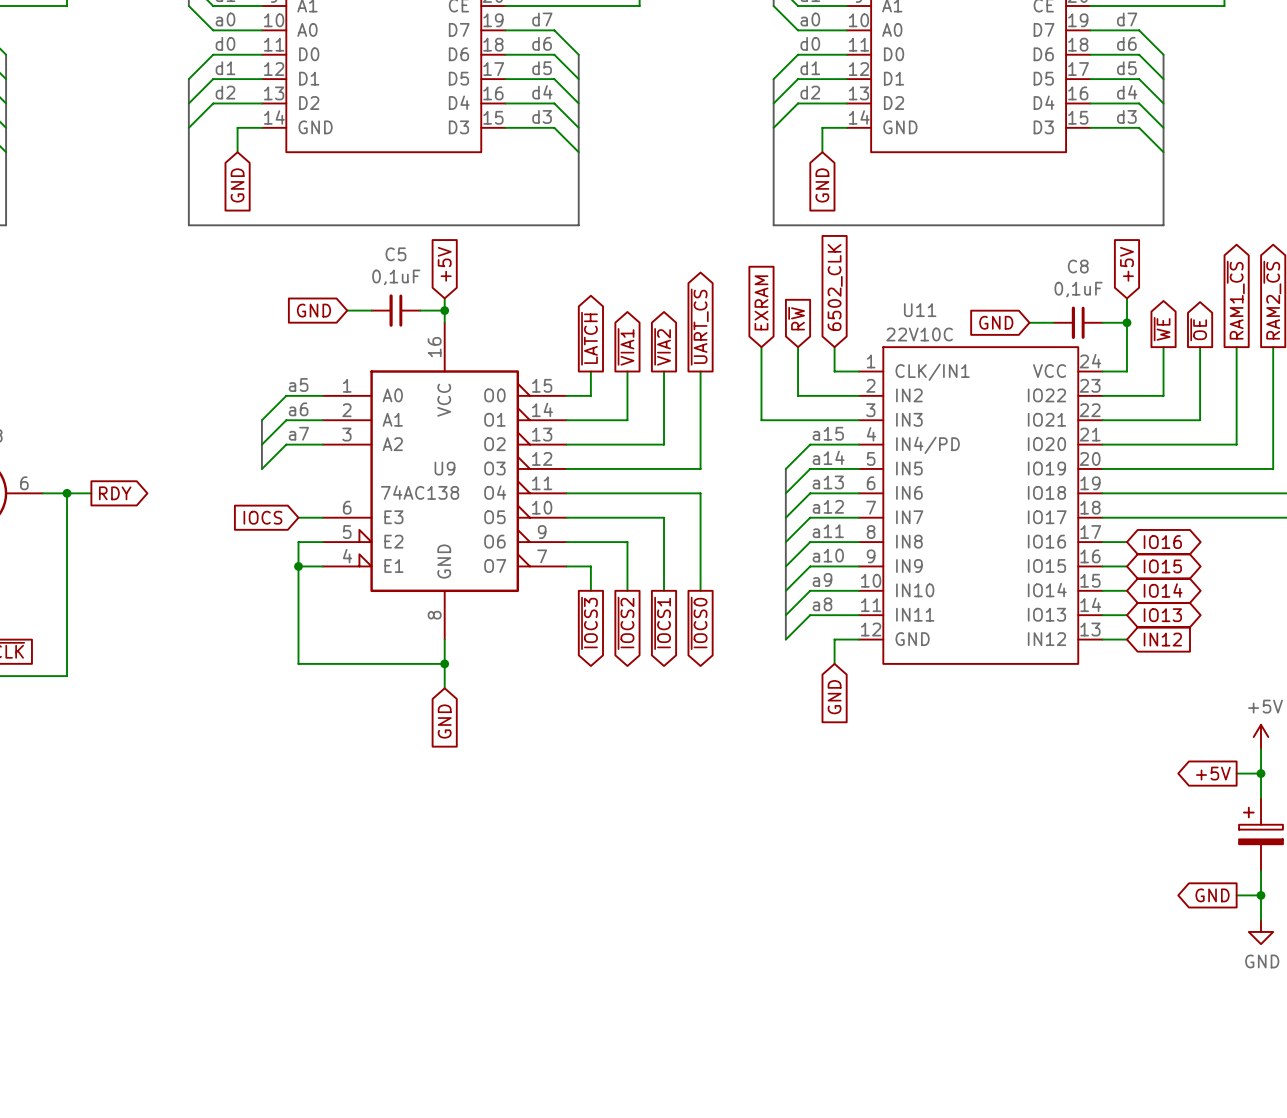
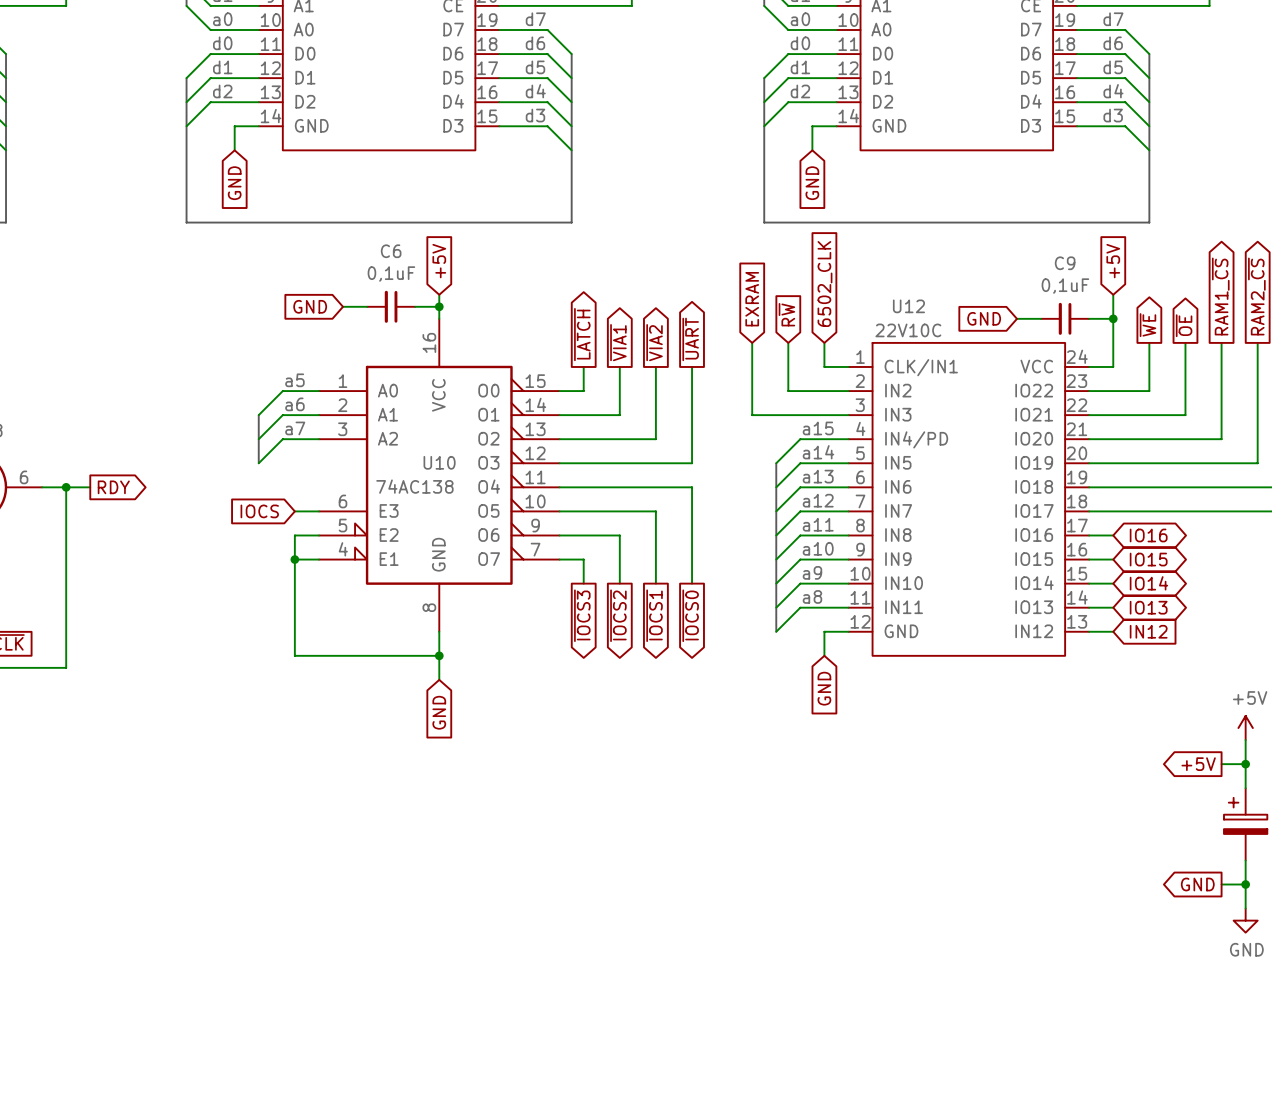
C5 name: C5 (395, 254) -> C6 (391, 251)
C8 name: C8 (1078, 266) -> C9 (1065, 263)
U11 name: U11 (920, 310) -> U12 (908, 306)
global label: ~{UART_CS} (699, 327) -> ~{UART} (690, 339)
U9 name: U9 (444, 468) -> U10 (439, 462)

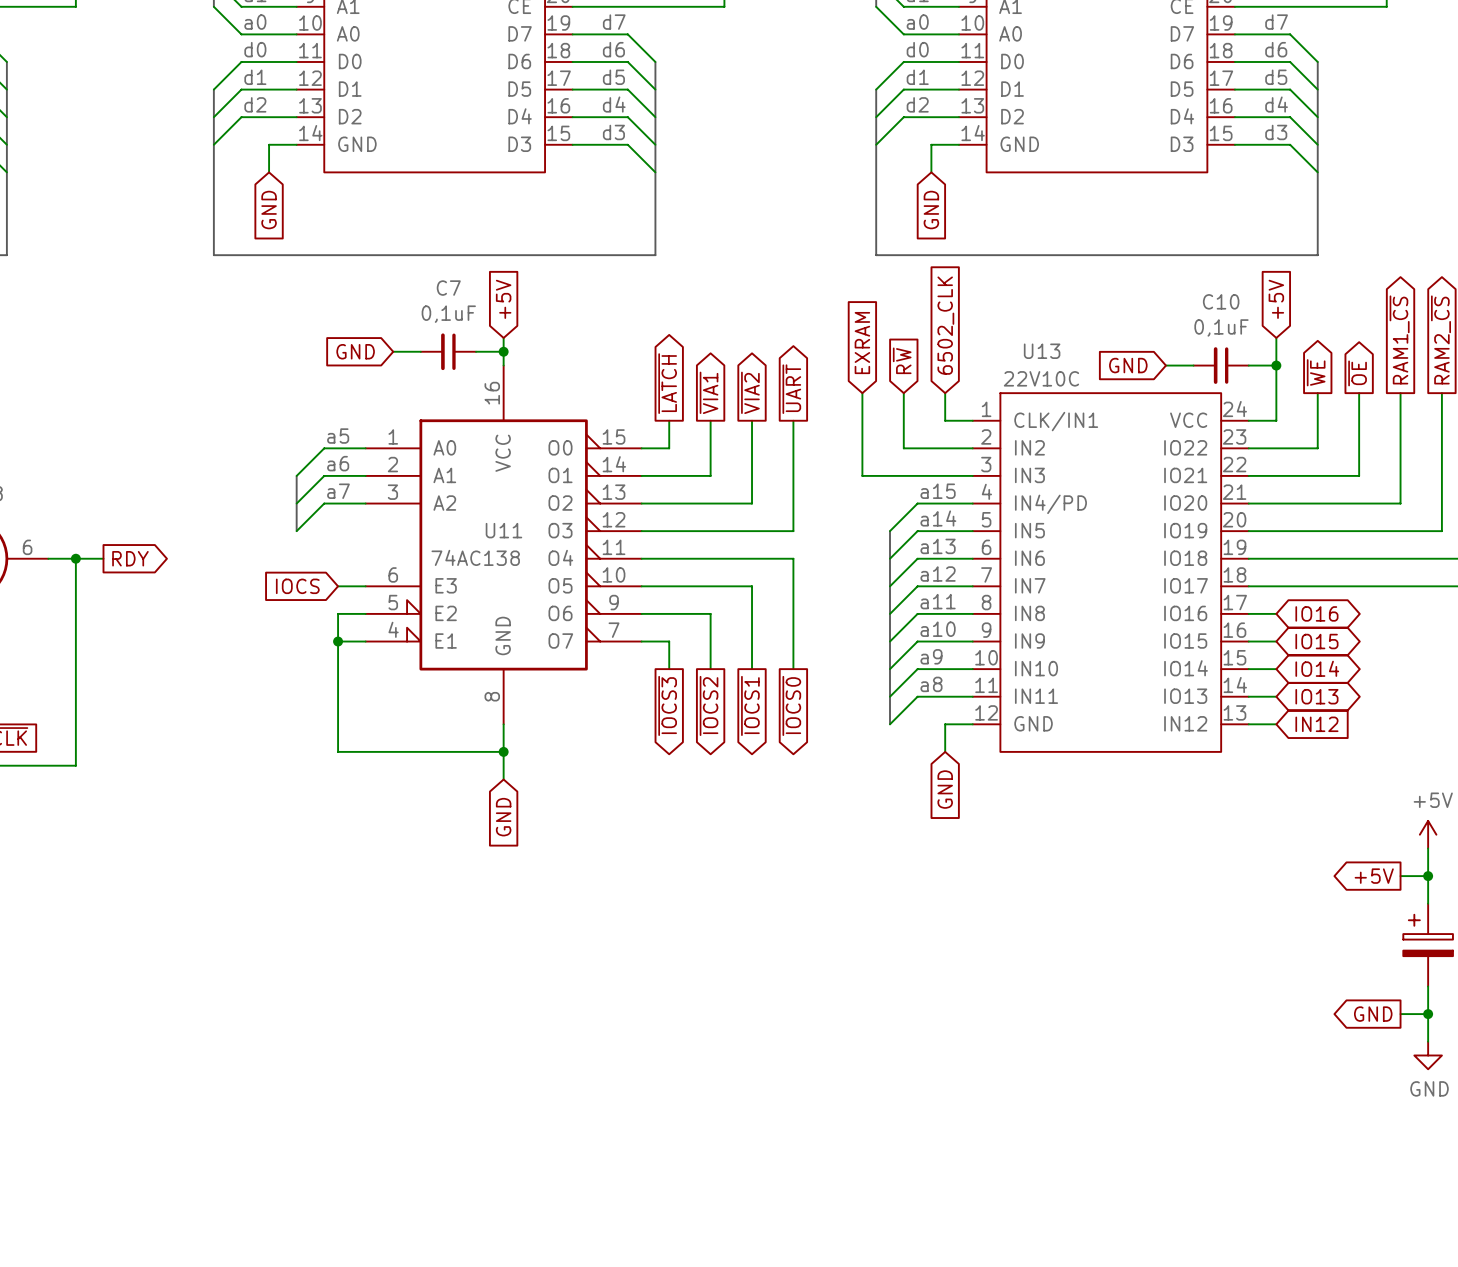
C6 name: C6 (391, 251) -> C7 (448, 288)
C9 name: C9 (1065, 263) -> C10 (1221, 301)
U12 name: U12 (908, 306) -> U13 (1042, 351)
U10 name: U10 (439, 462) -> U11 (503, 530)

